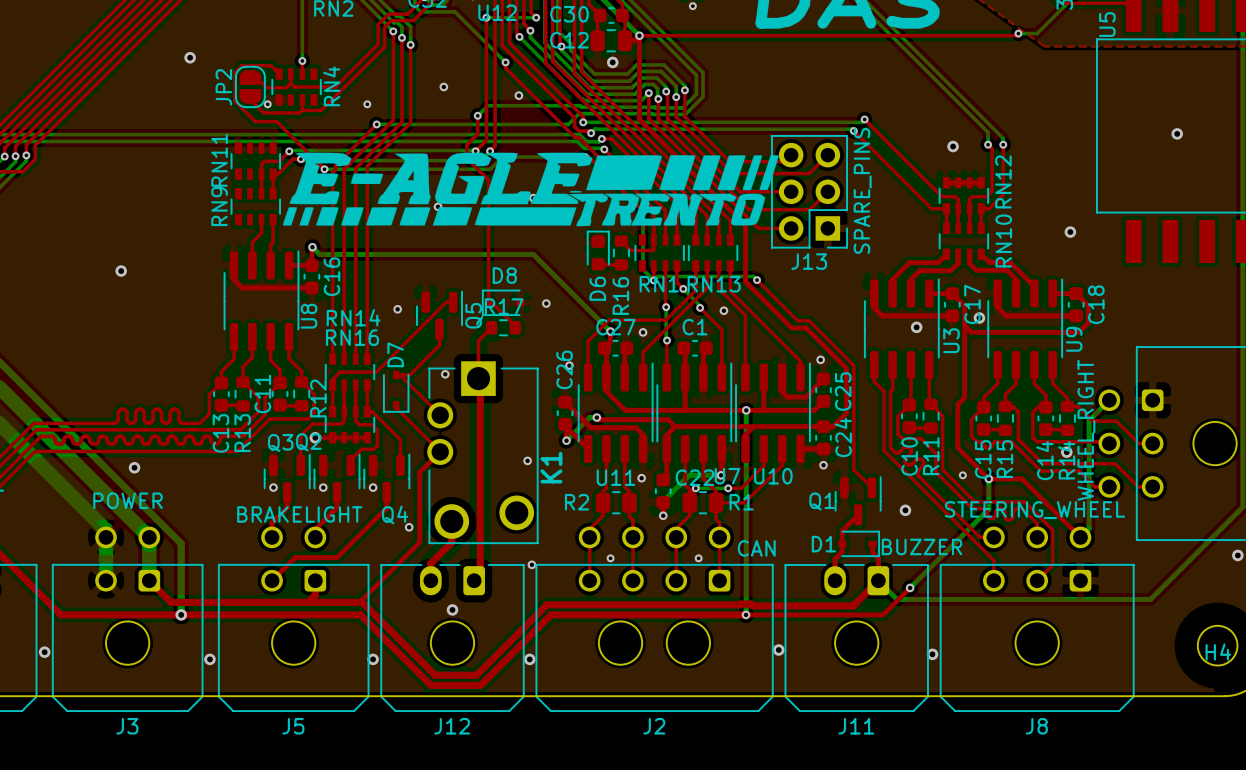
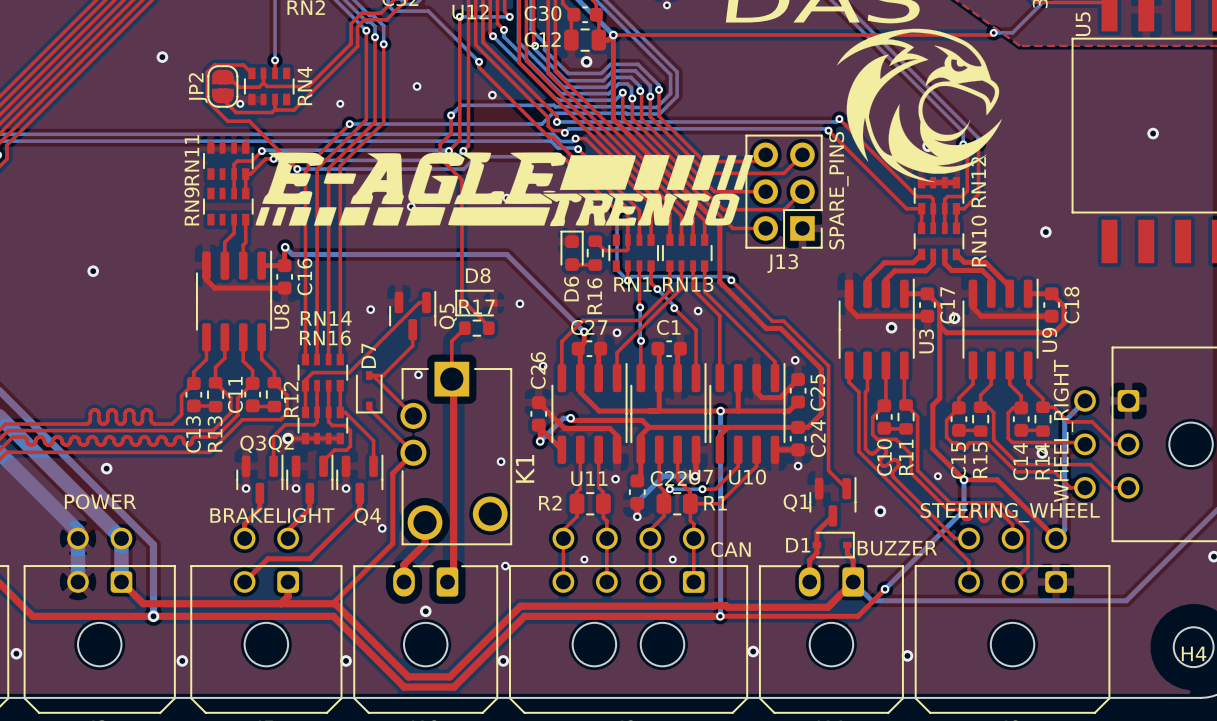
drawing: none -> [837, 28, 1002, 183]

